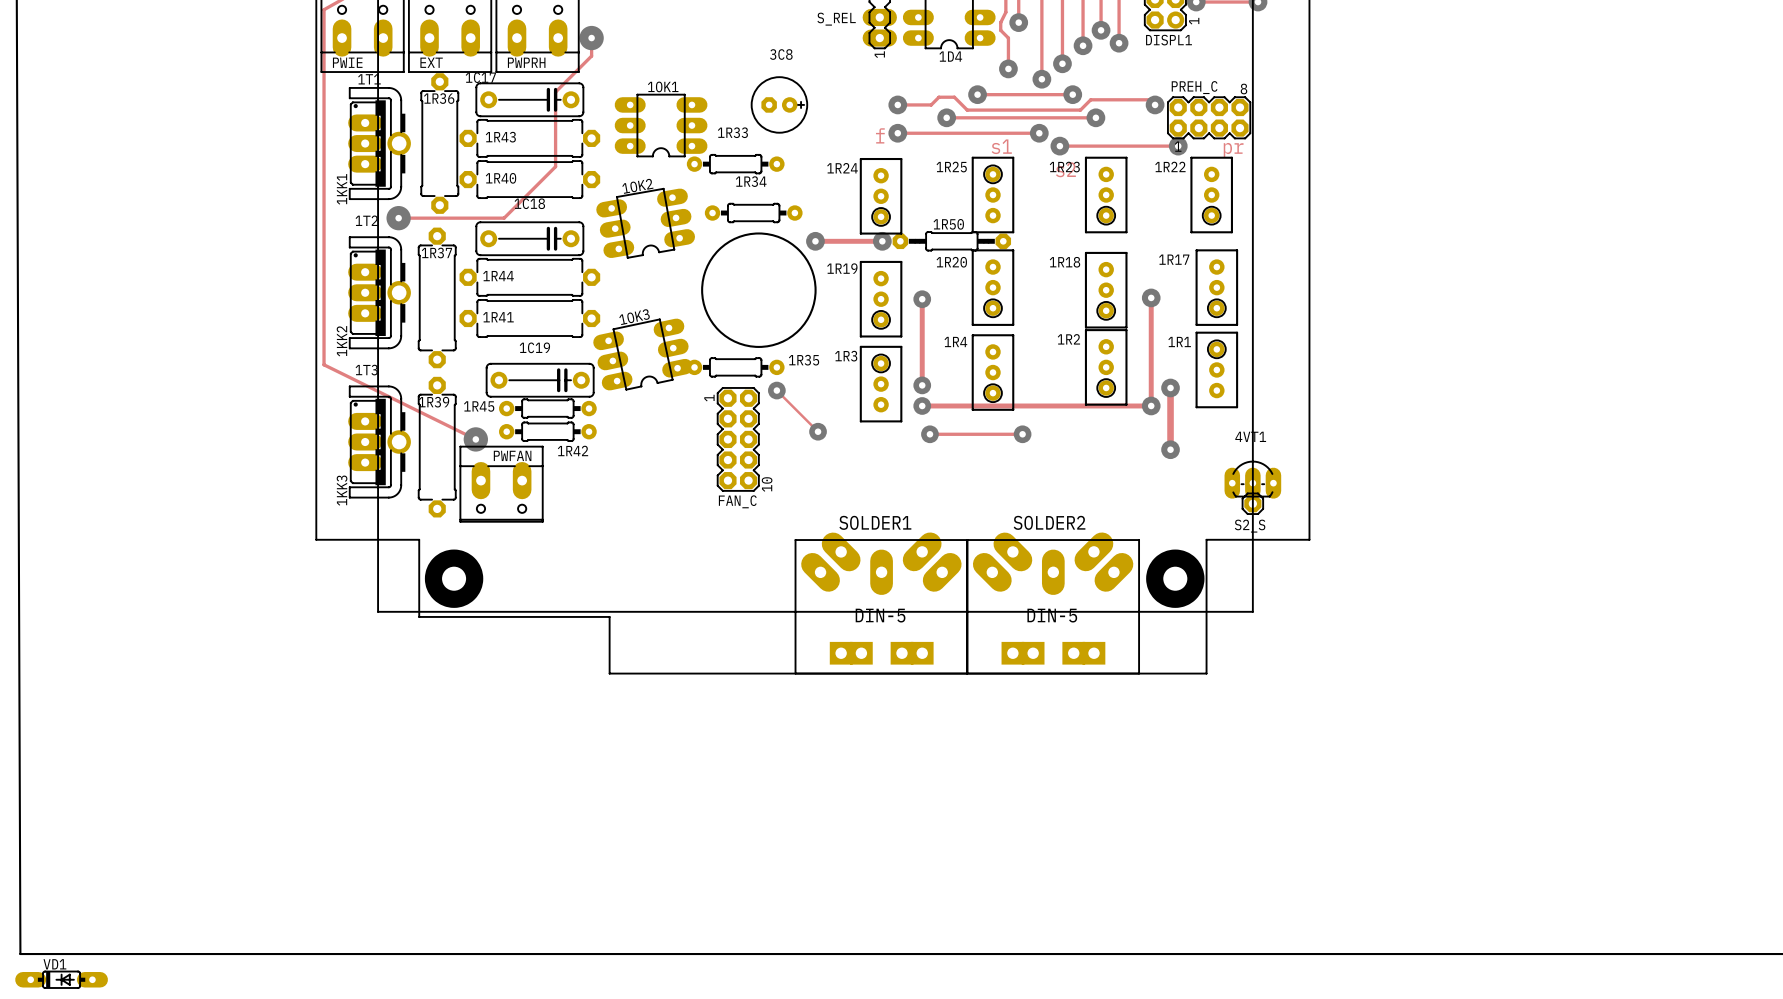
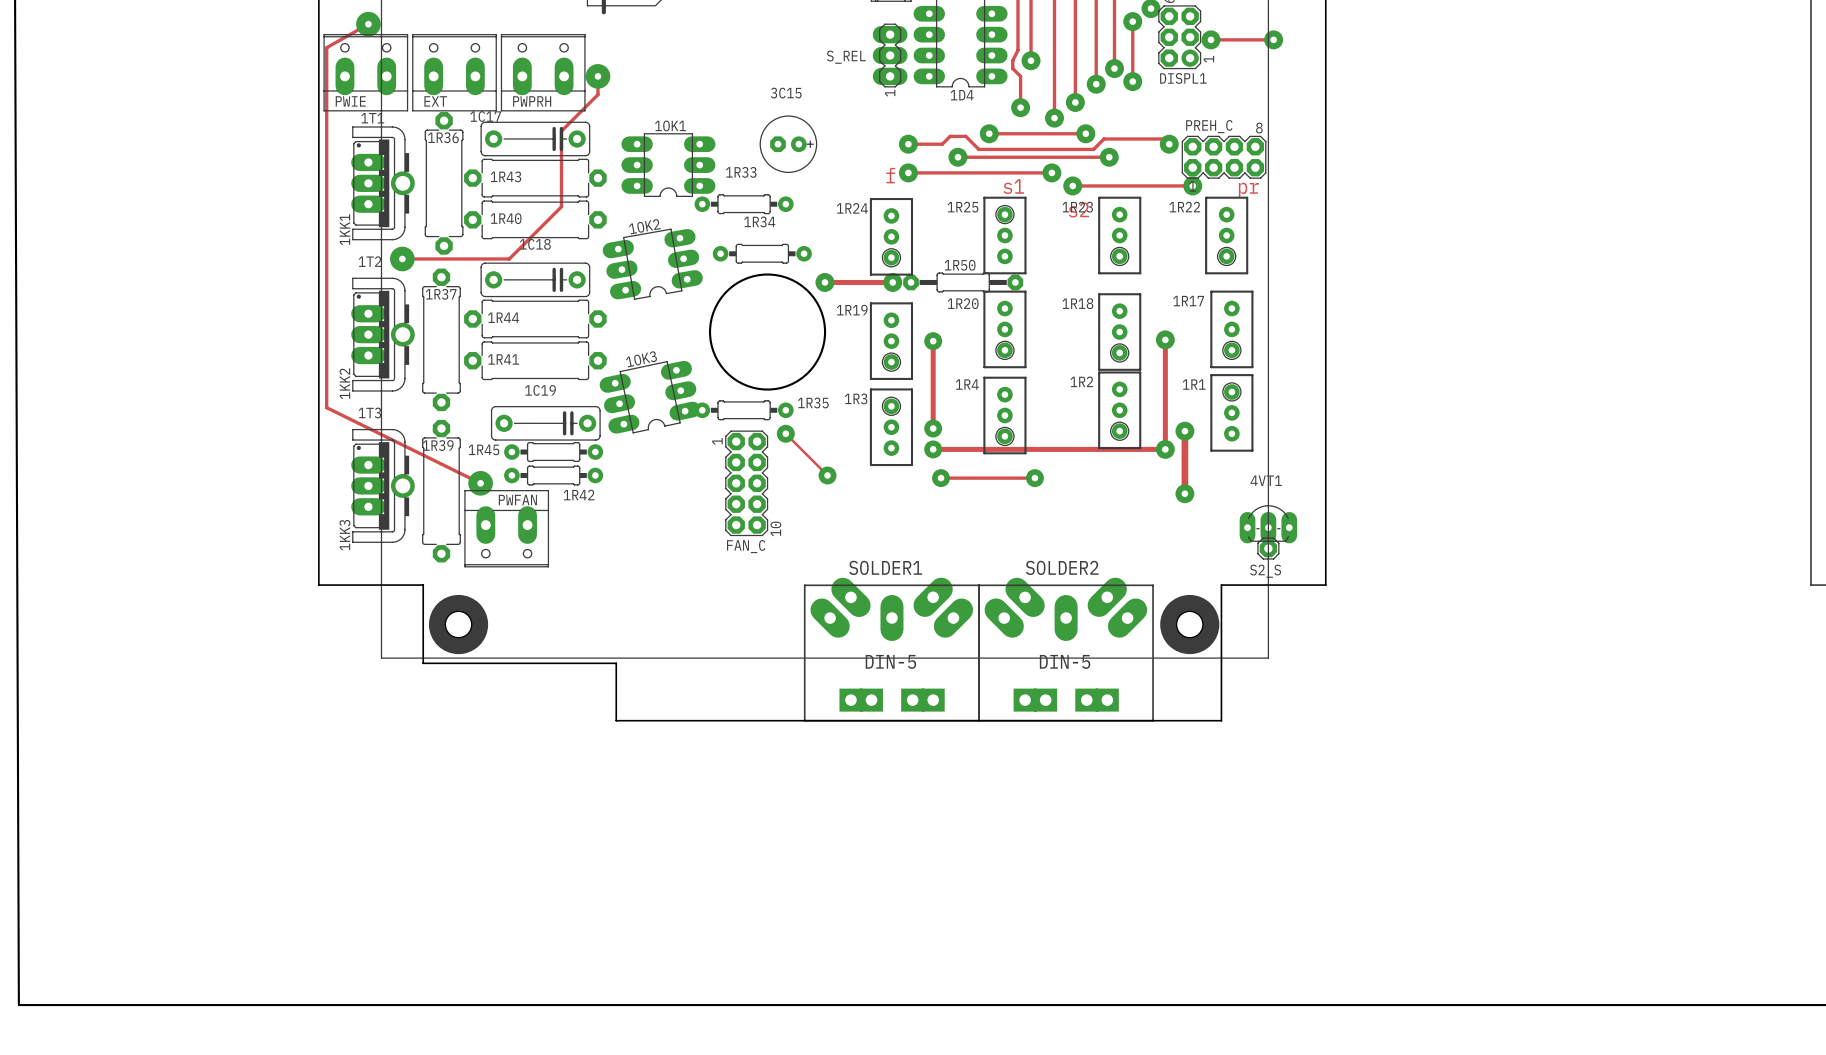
3C8 name: 3C8 (781, 54) -> 3C15 (786, 93)
VD1: (61, 979) -> none

